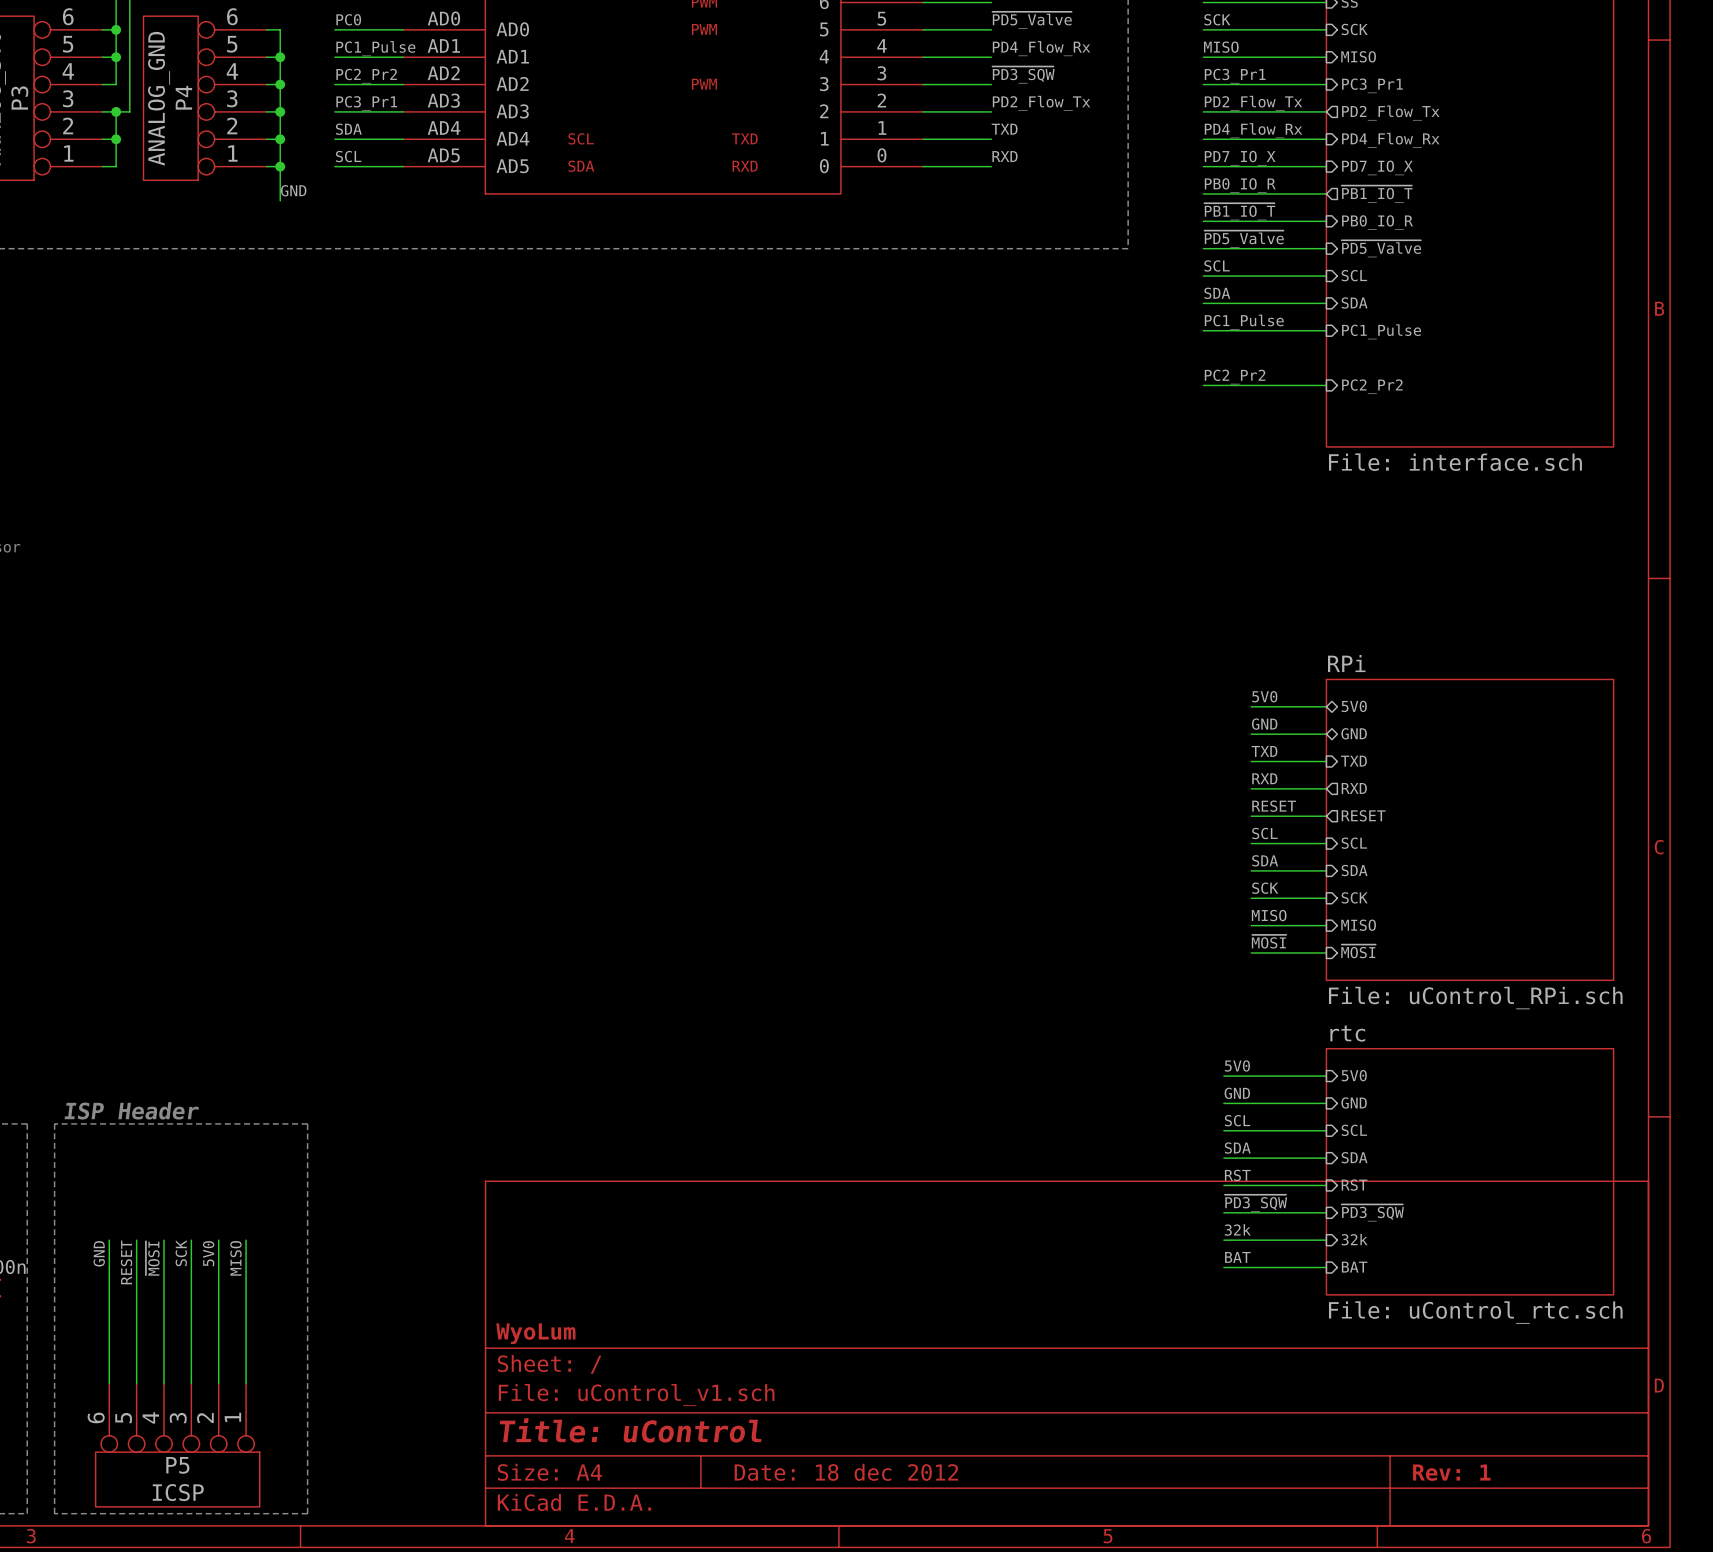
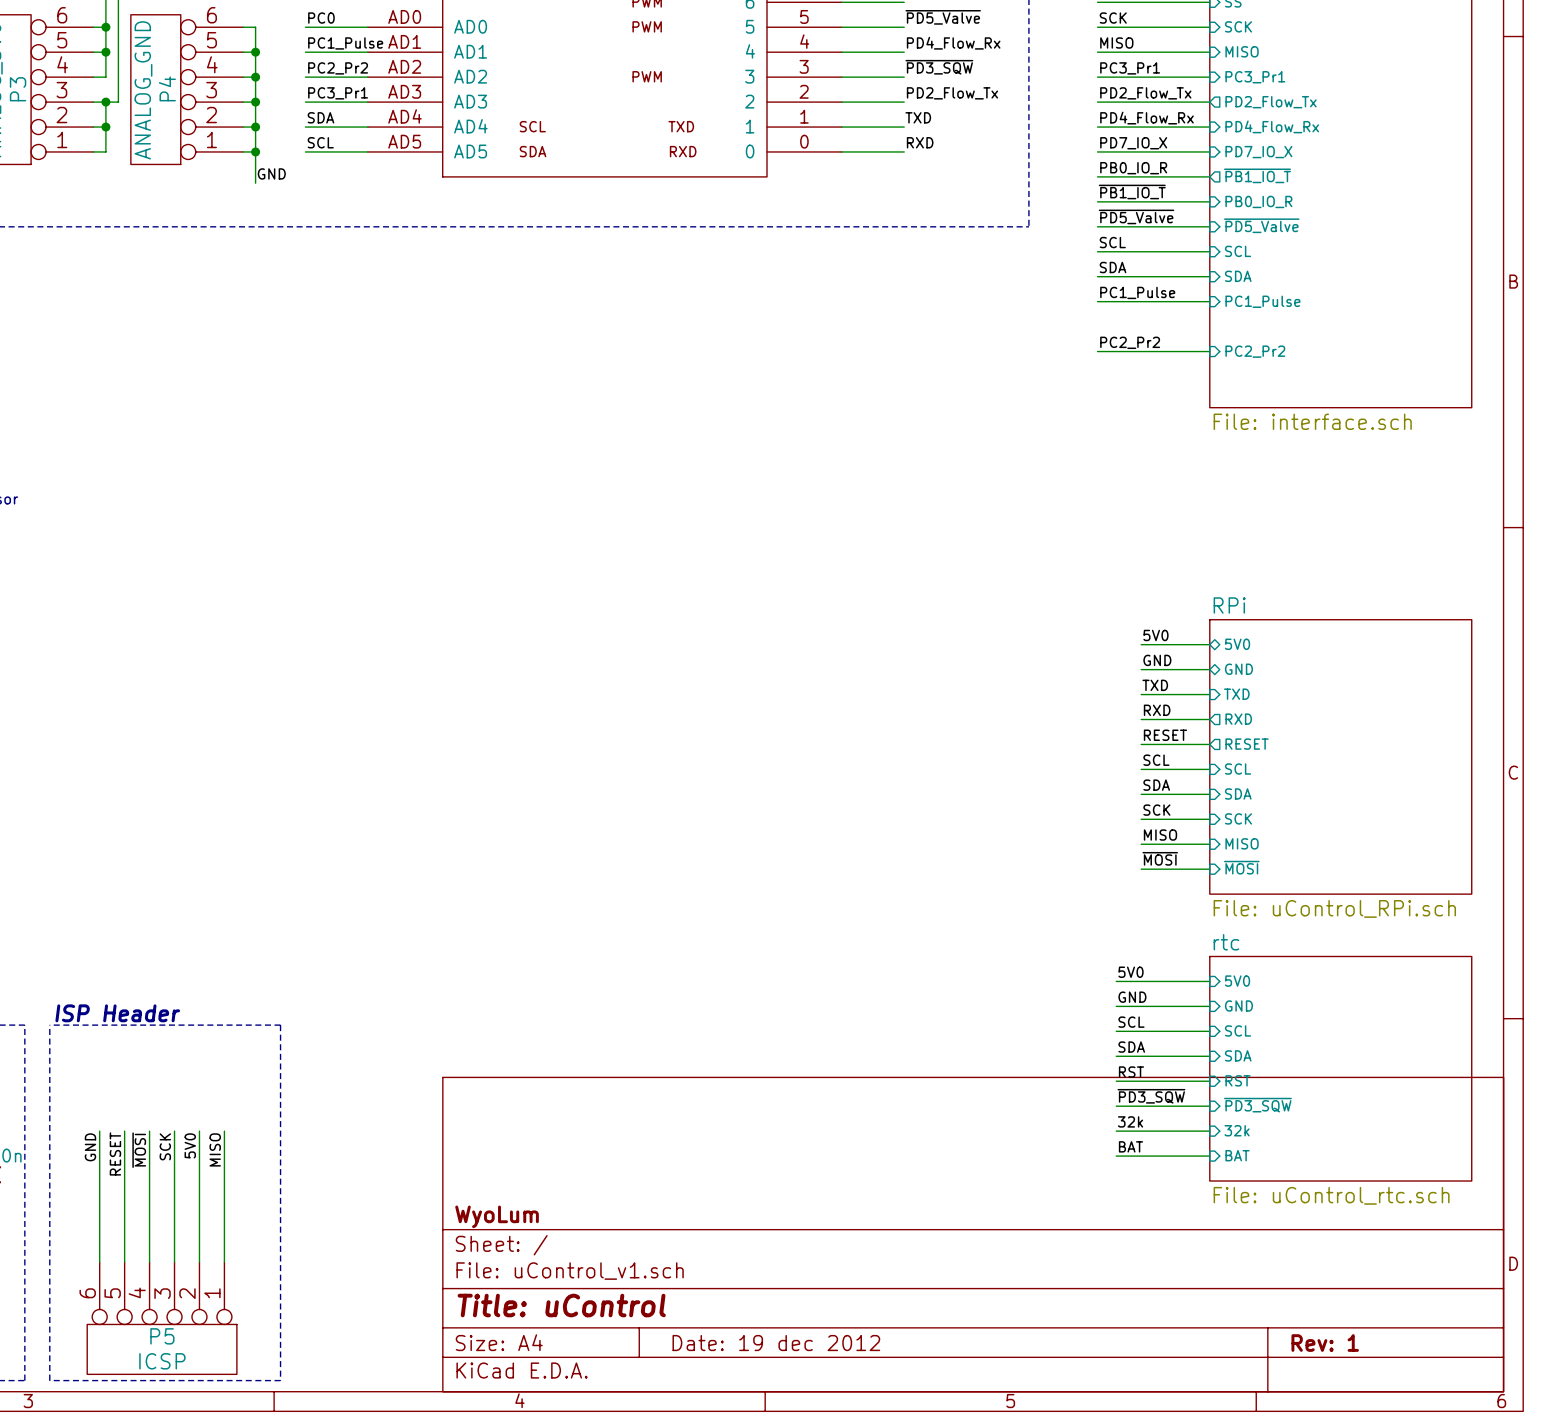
title block: Date: 18 dec 2012 (846, 1472) -> Date: 19 dec 2012 (776, 1343)

